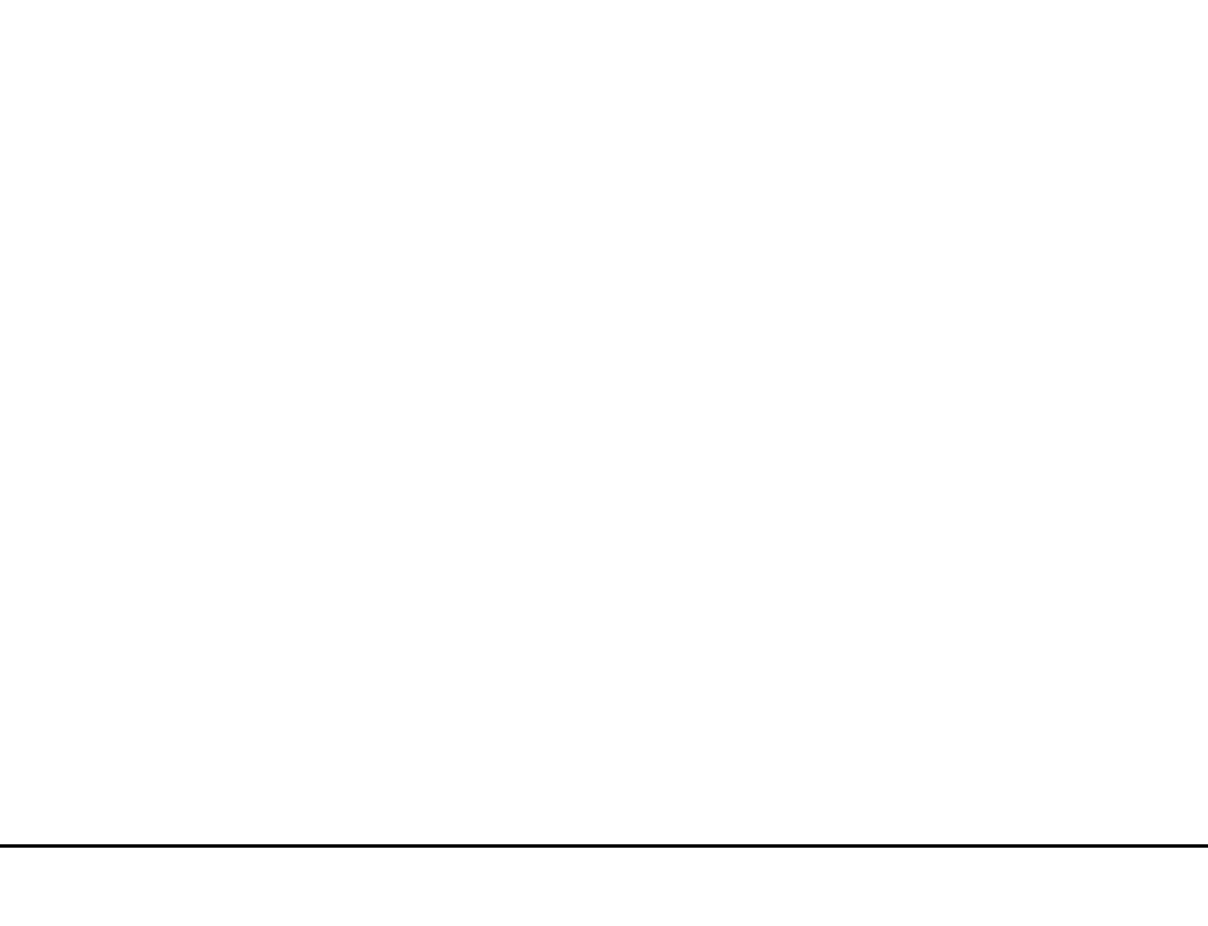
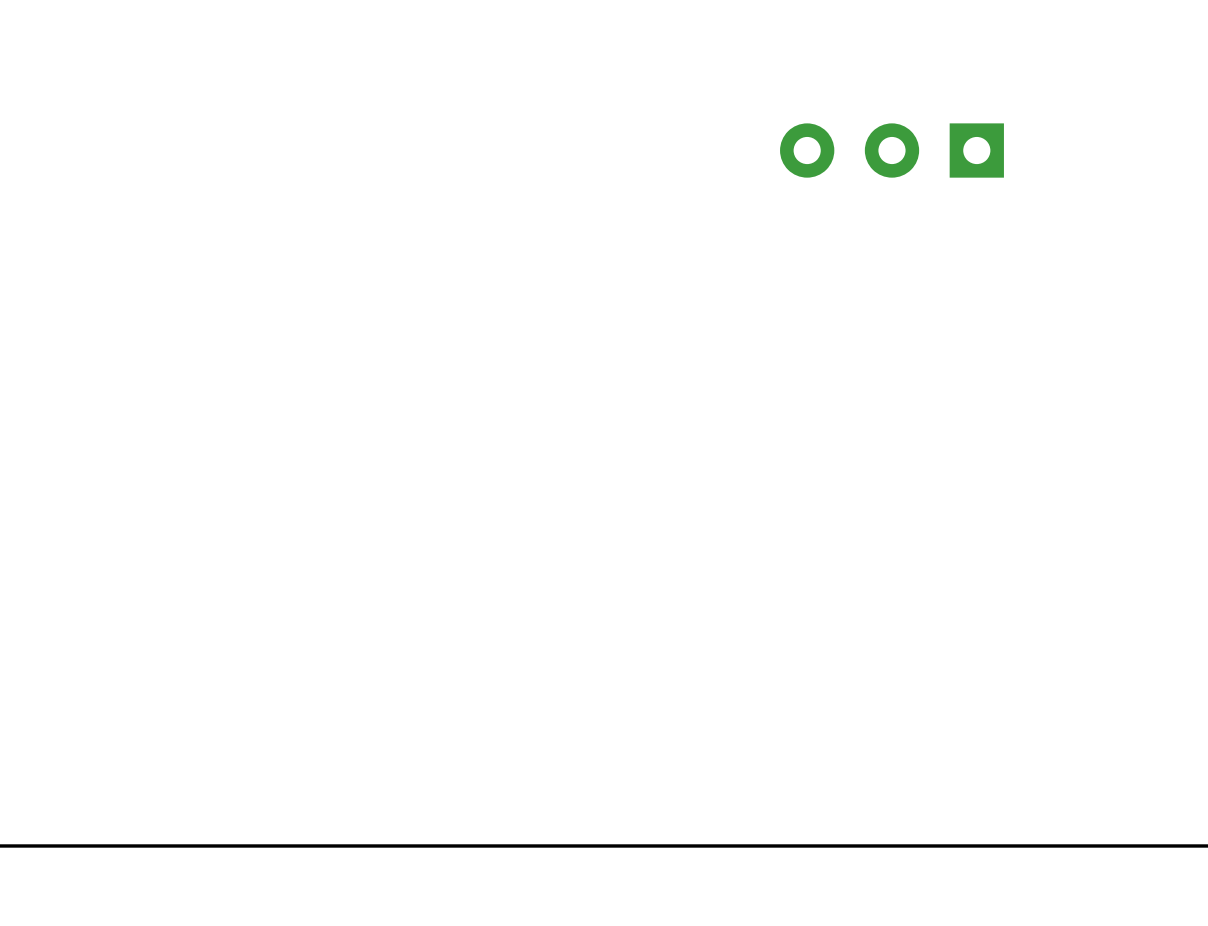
part: none -> (891, 150)

